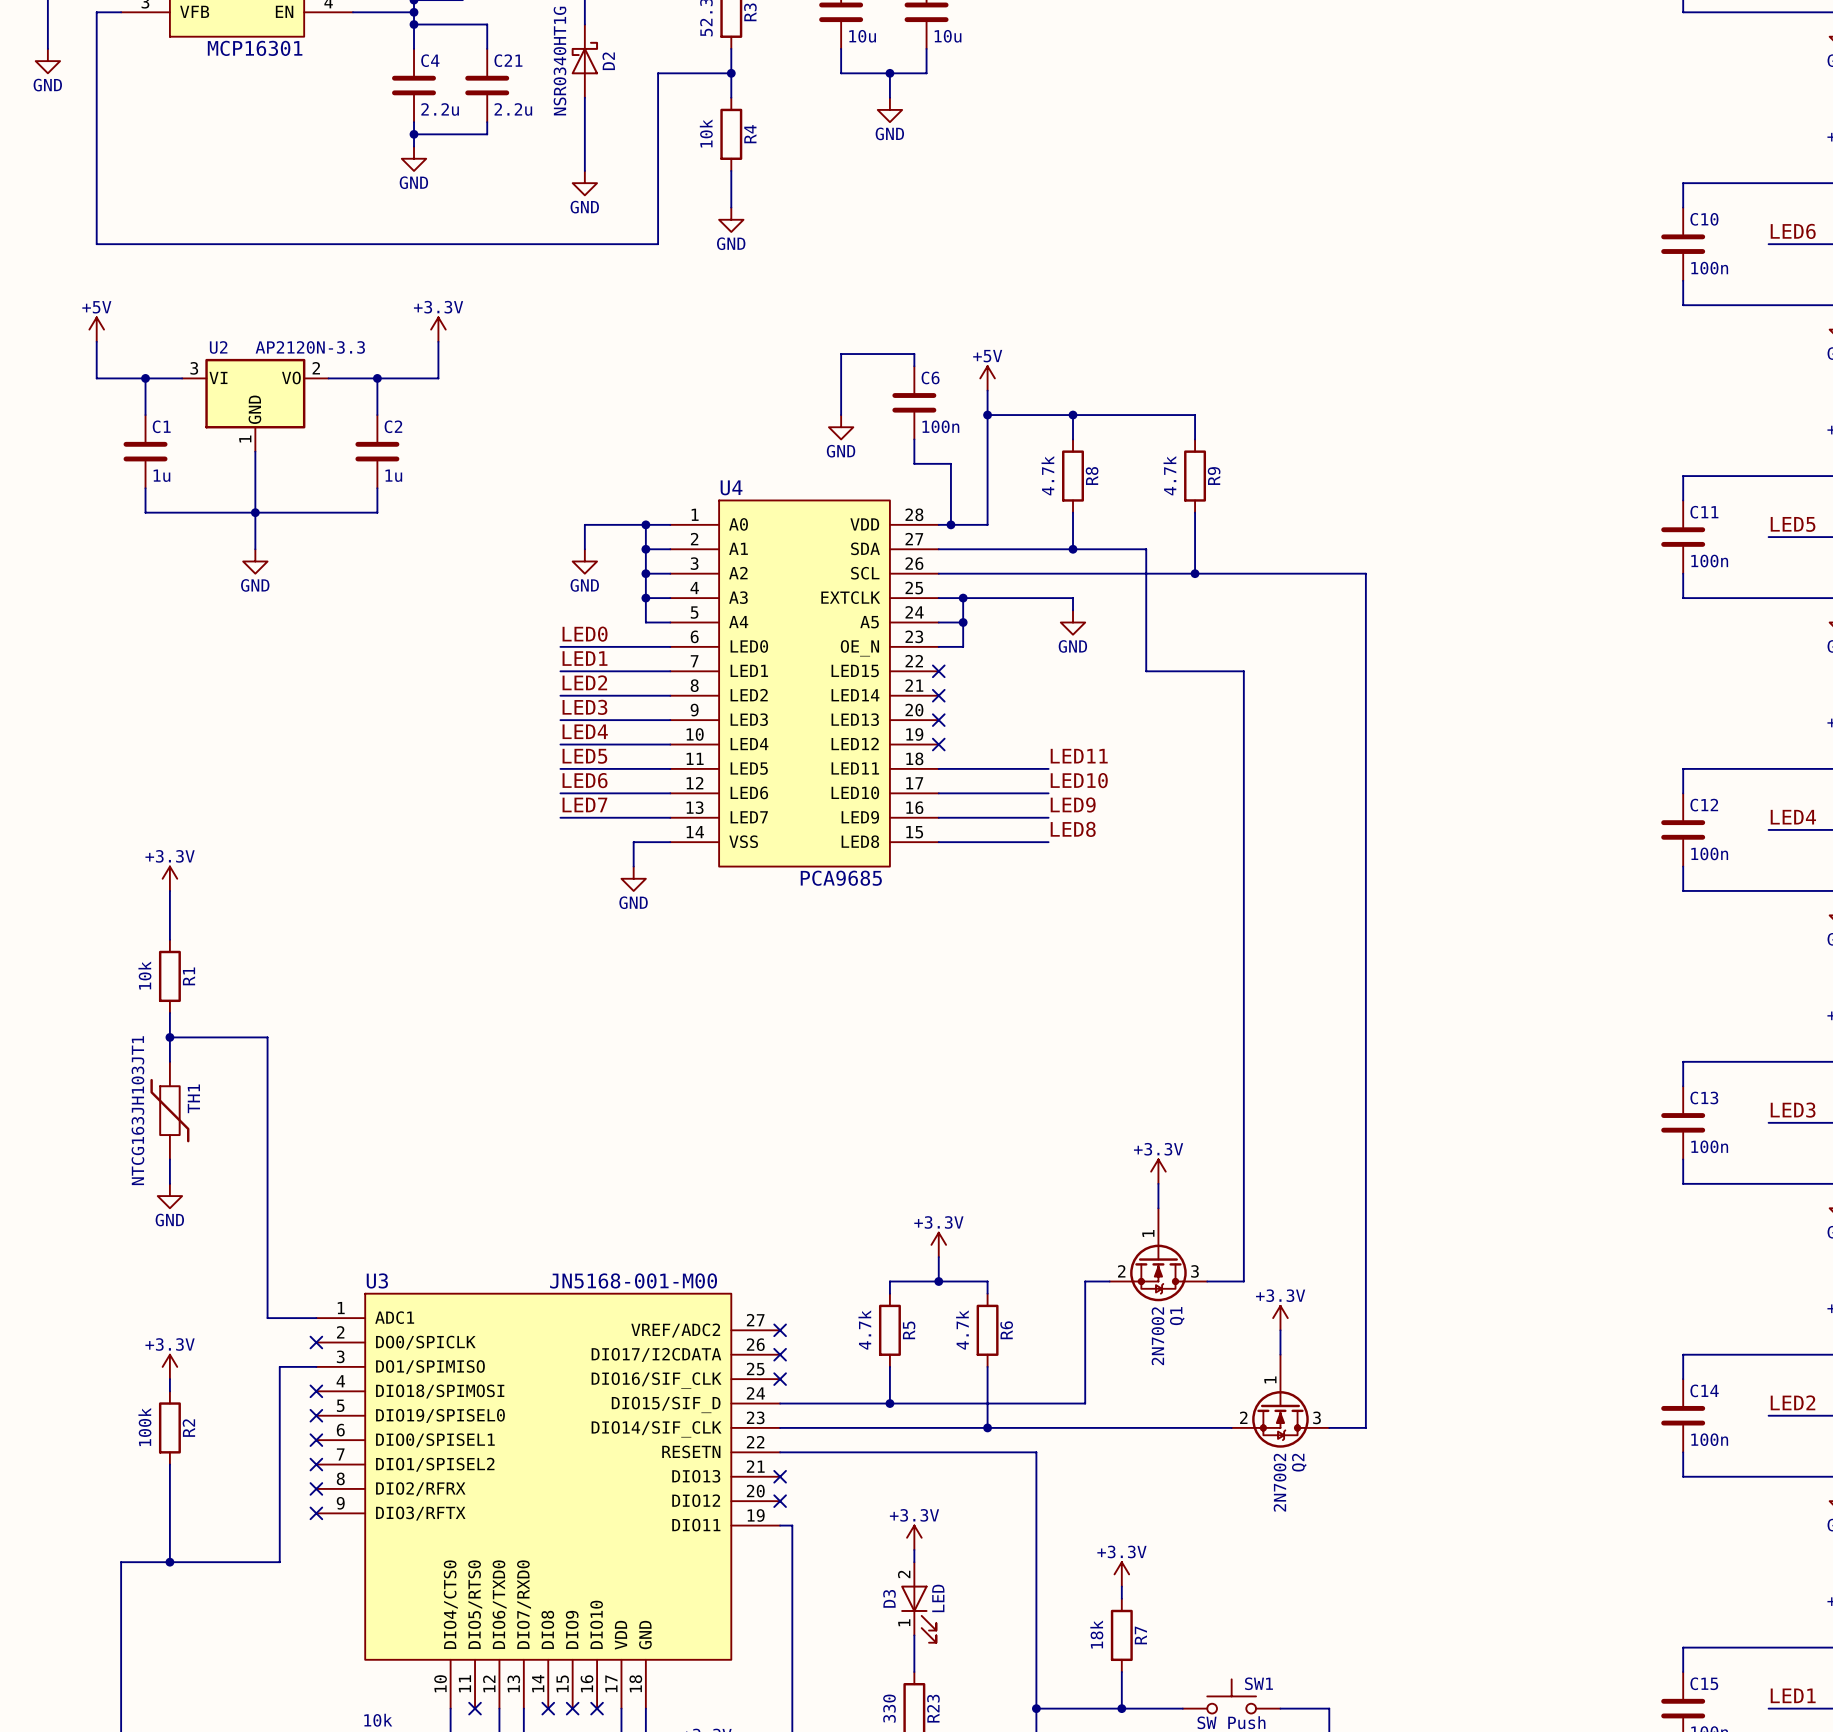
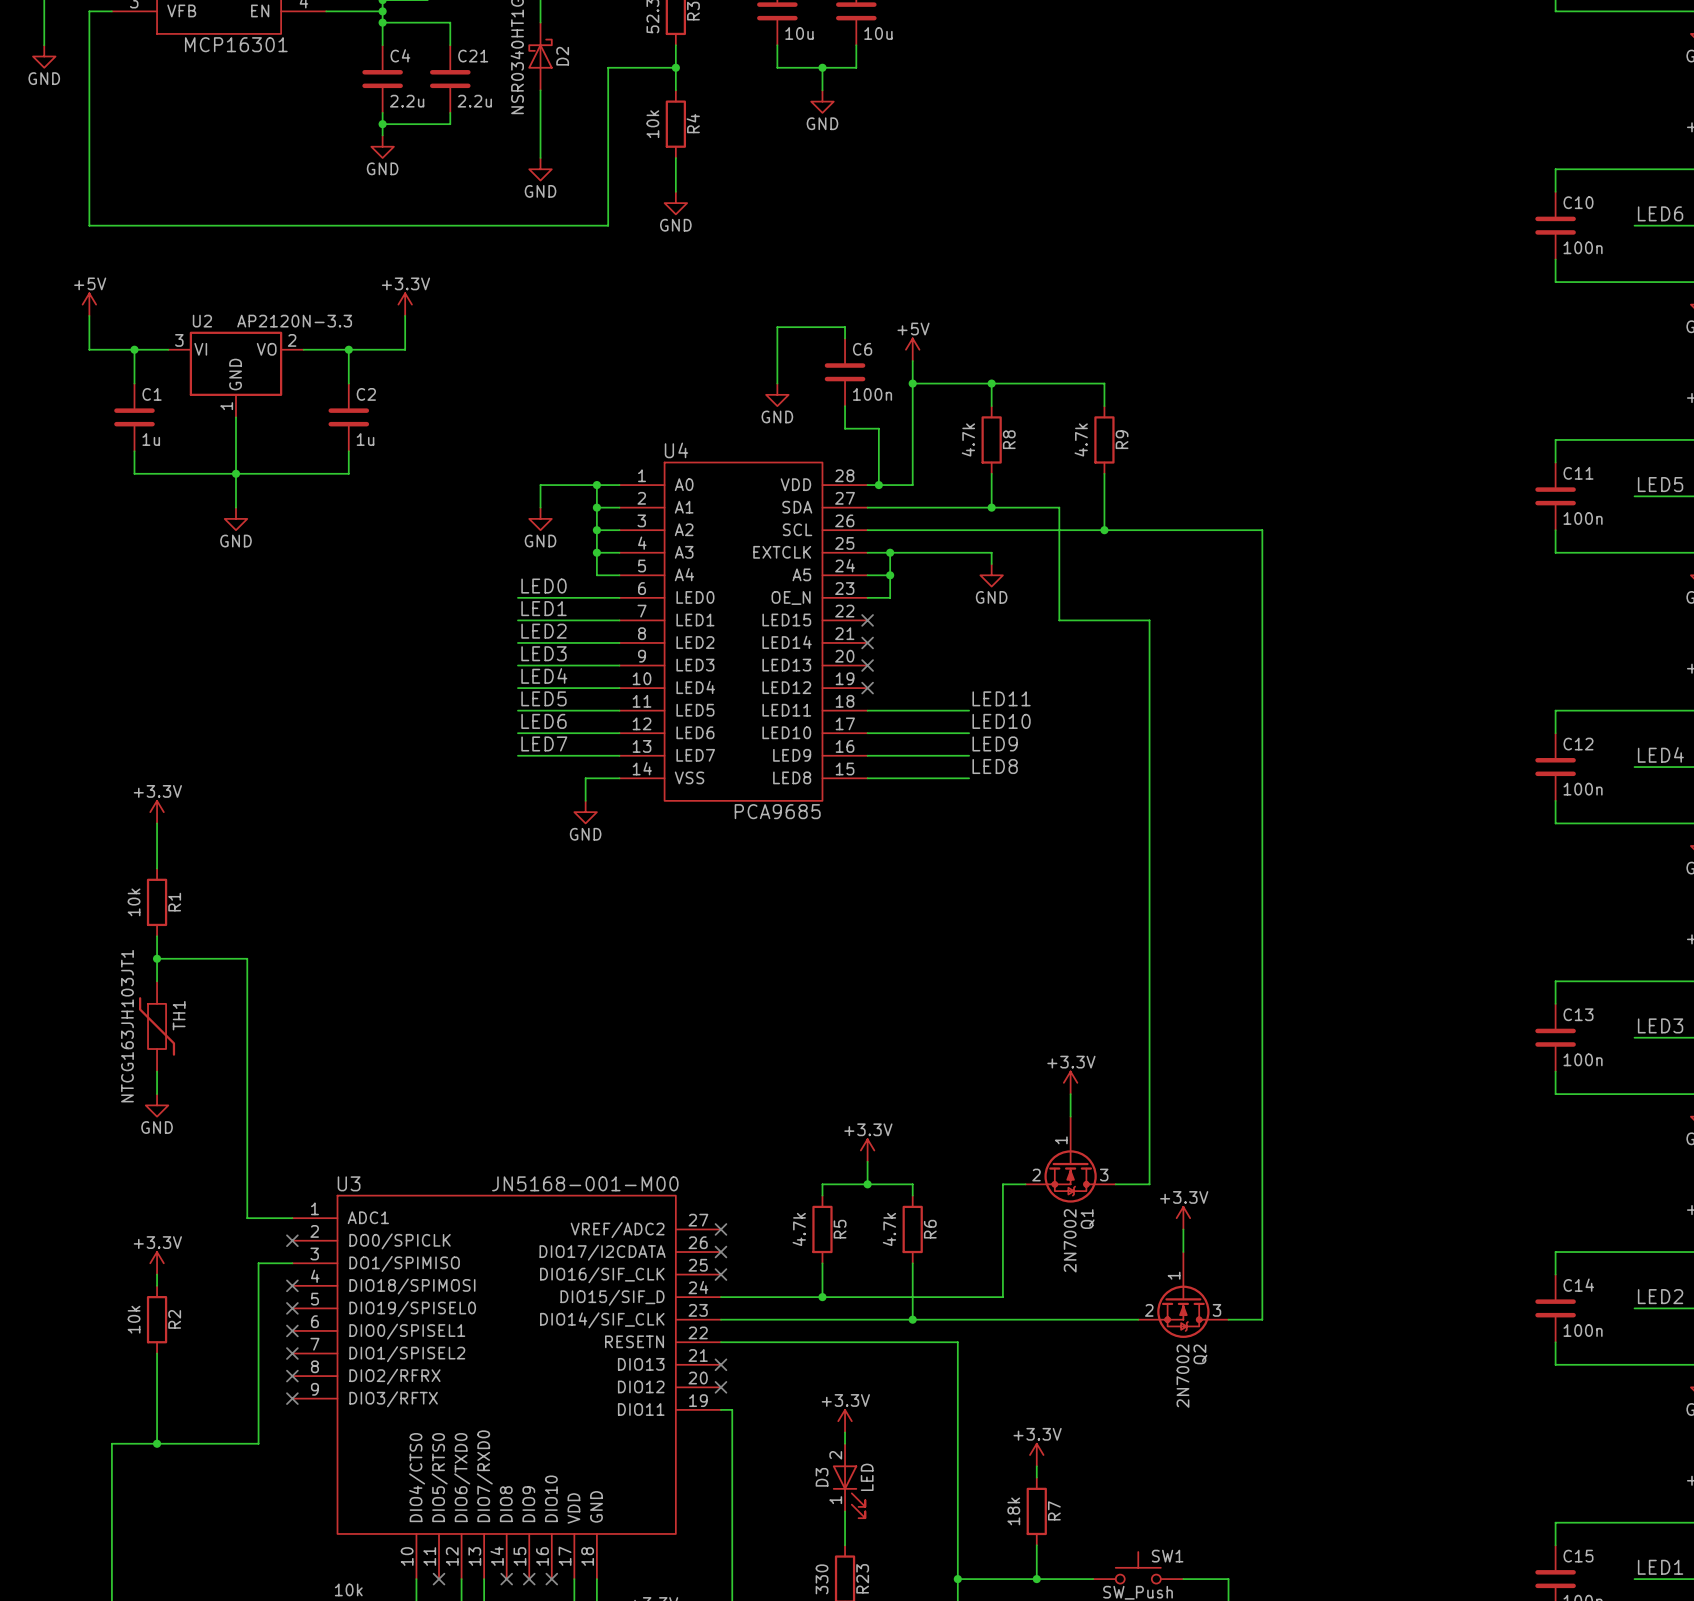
R2 value: 100k (144, 1427) -> 10k (134, 1319)

